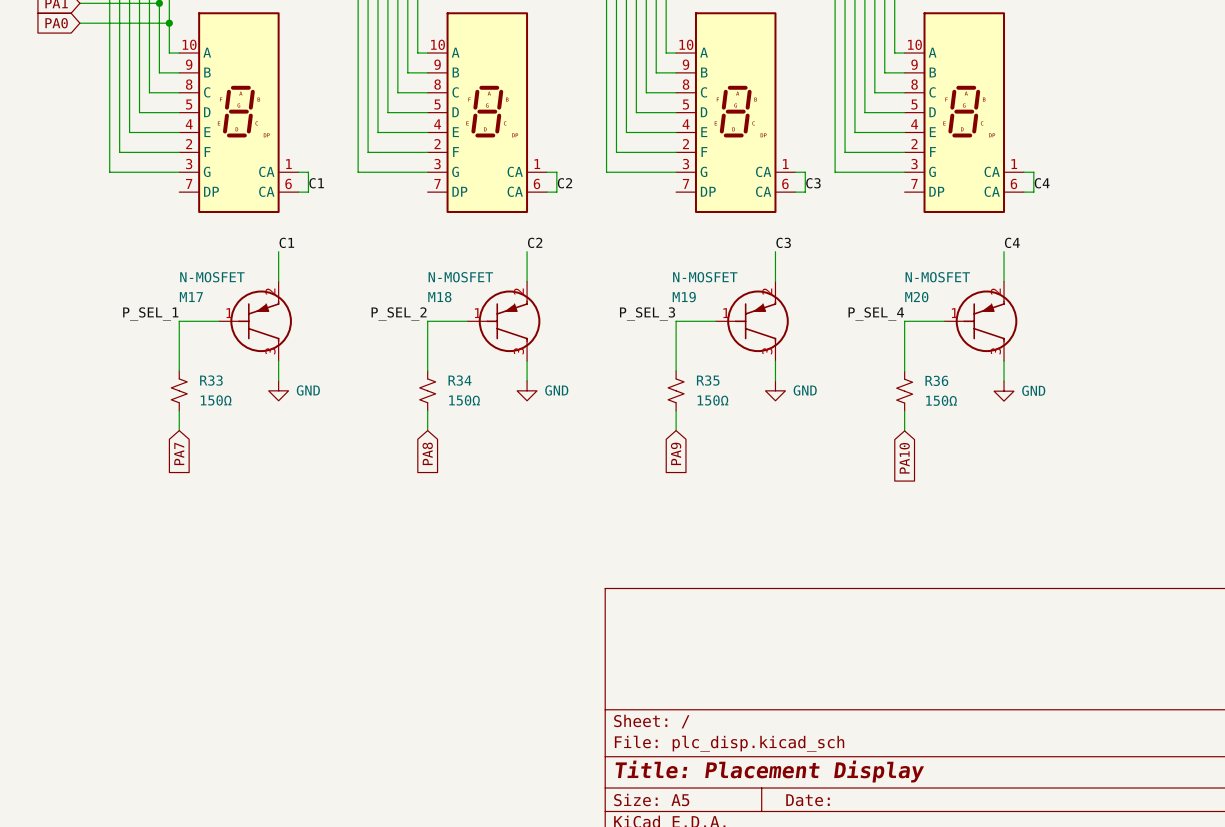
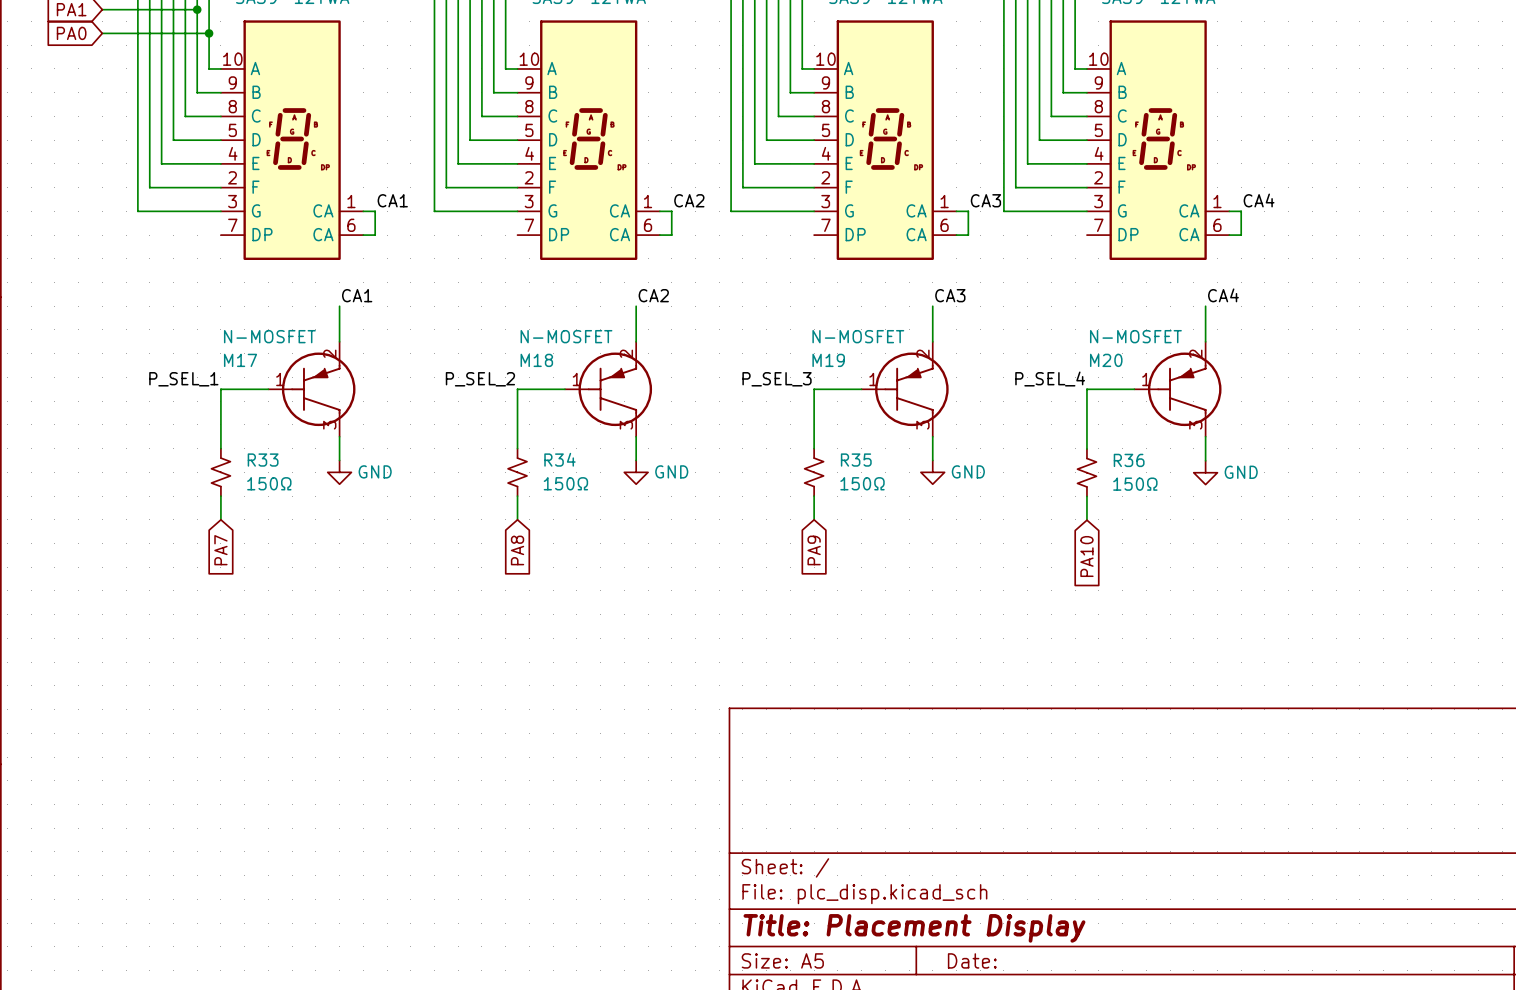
label: C1 (316, 183) -> CA1 (392, 200)
label: C2 (564, 183) -> CA2 (689, 200)
label: C3 (813, 183) -> CA3 (985, 200)
label: C4 (1042, 183) -> CA4 (1259, 200)
label: C1 (286, 242) -> CA1 (357, 295)
label: C2 (535, 242) -> CA2 (653, 295)
label: C3 (783, 242) -> CA3 (950, 295)
label: C4 (1012, 242) -> CA4 (1223, 295)

